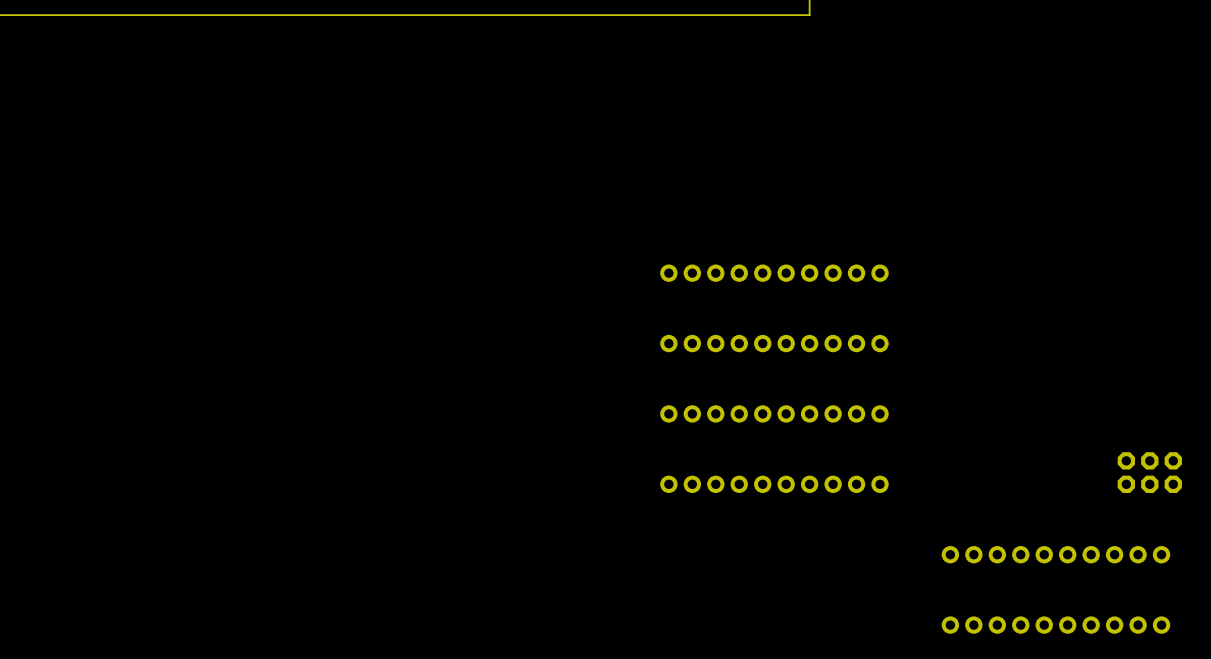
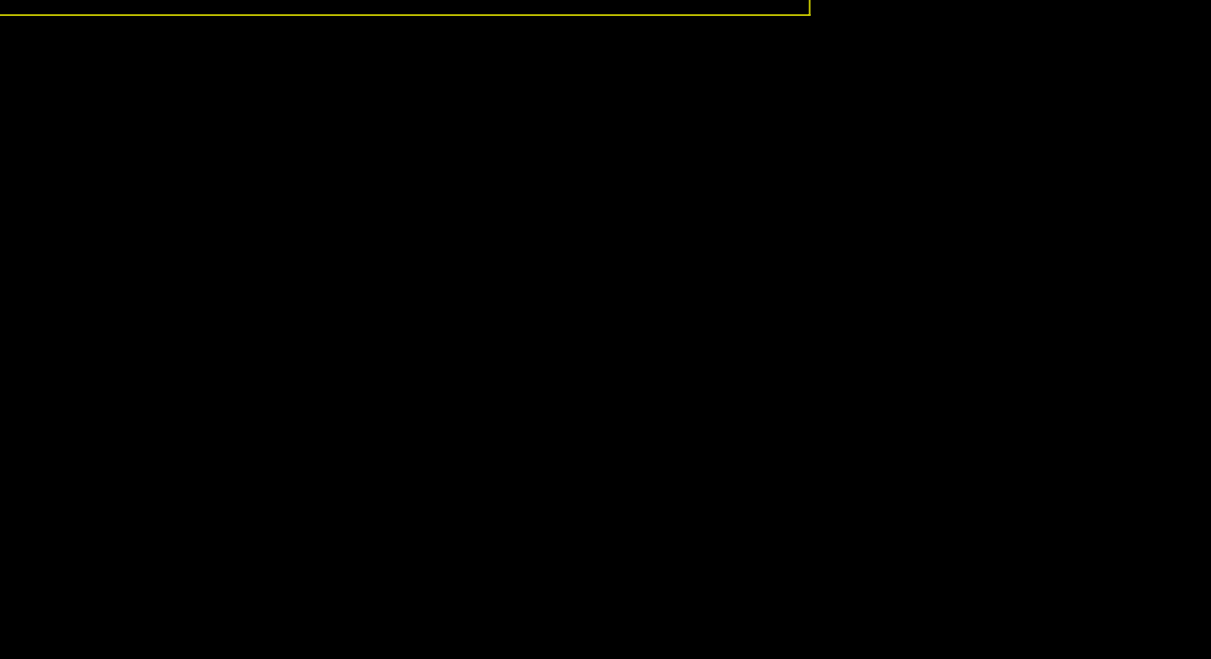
part: (774, 273) -> none
part: (774, 343) -> none
part: (774, 413) -> none
part: (1149, 472) -> none
part: (774, 484) -> none
part: (1055, 554) -> none
part: (1055, 625) -> none

